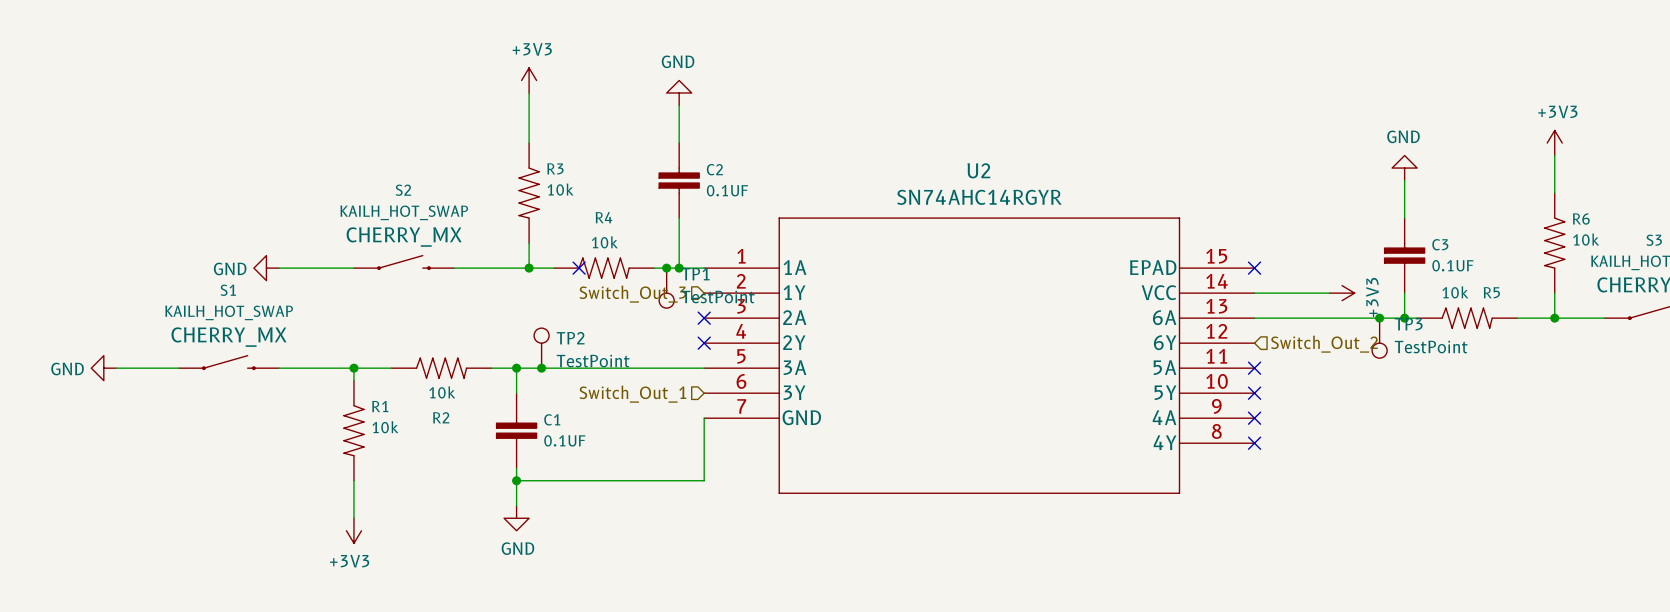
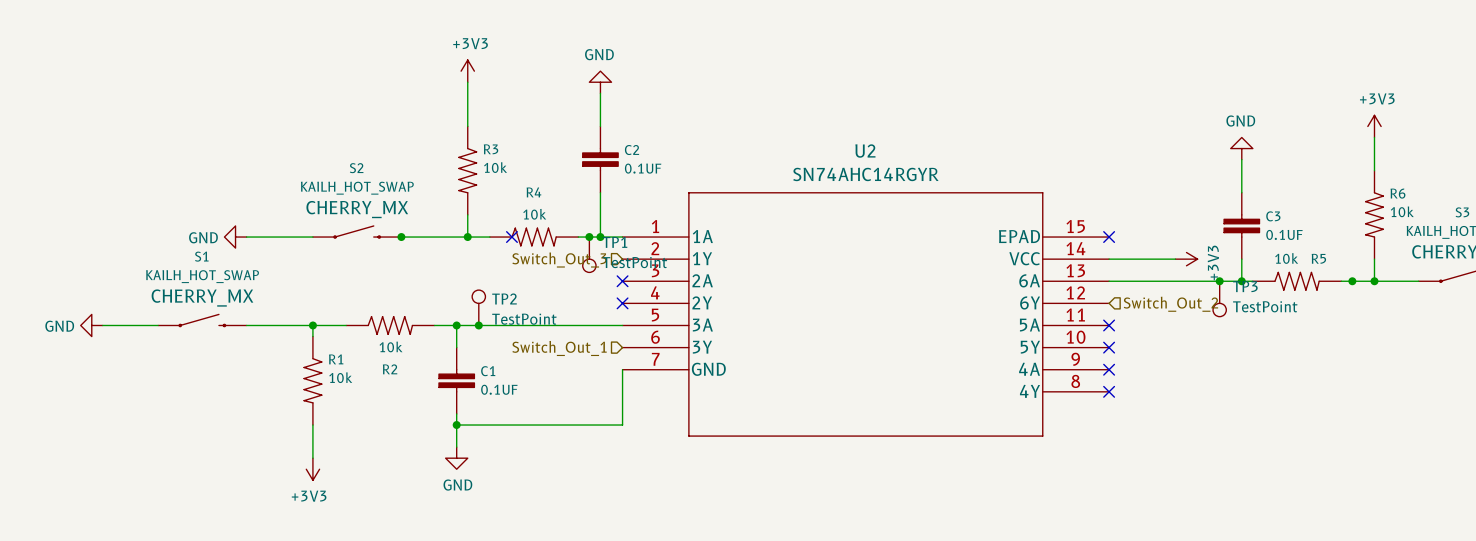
junction: none -> (401, 237)
junction: none -> (1352, 281)

